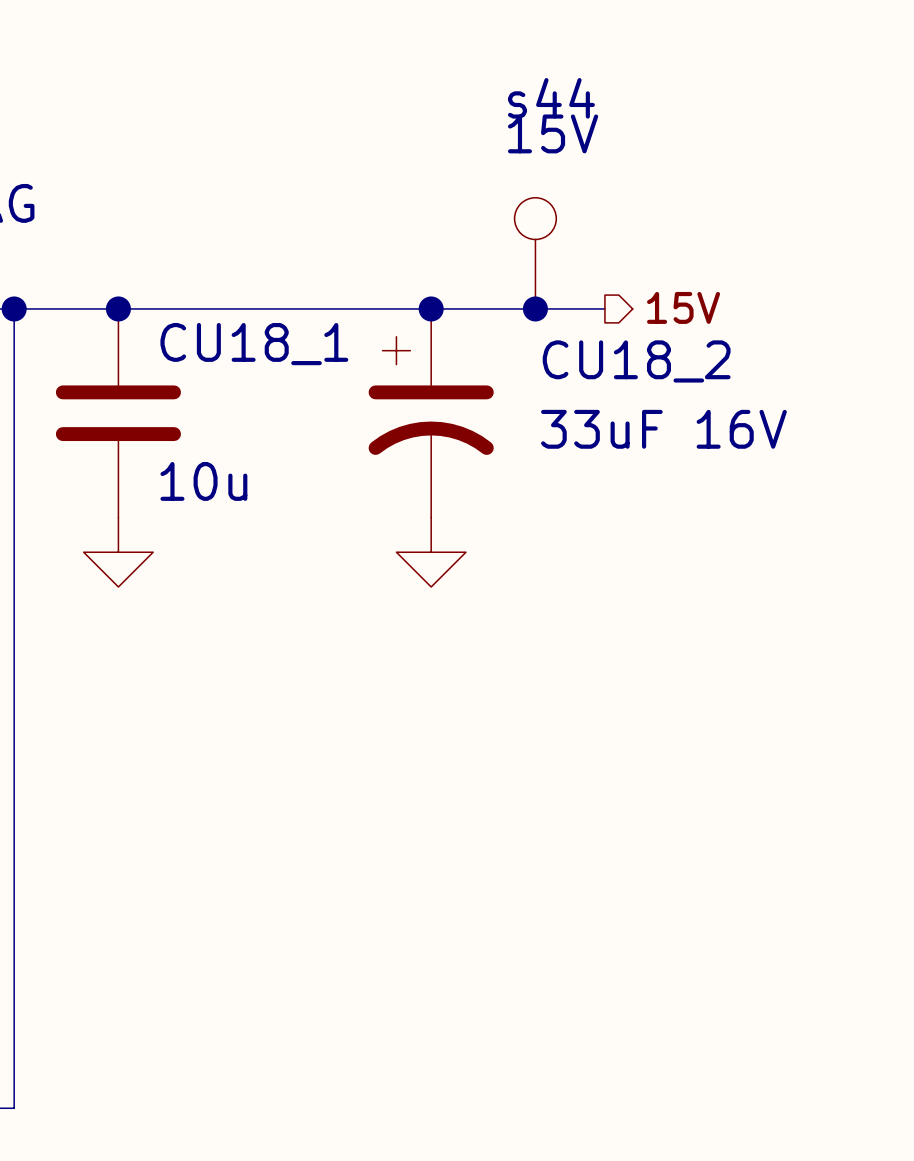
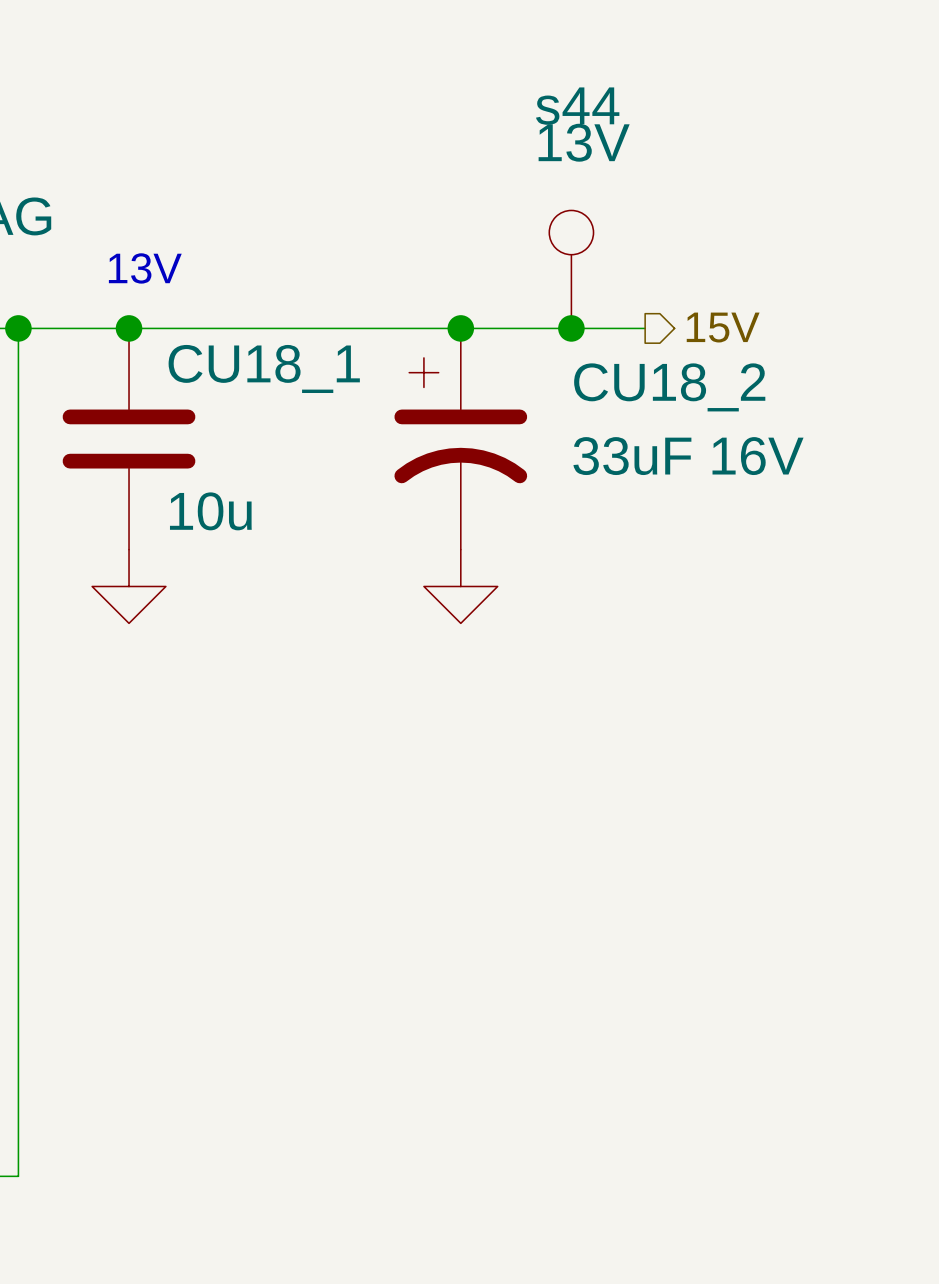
s44 value: 15V (553, 133) -> 13V (584, 142)
text: none -> 13V (145, 268)

